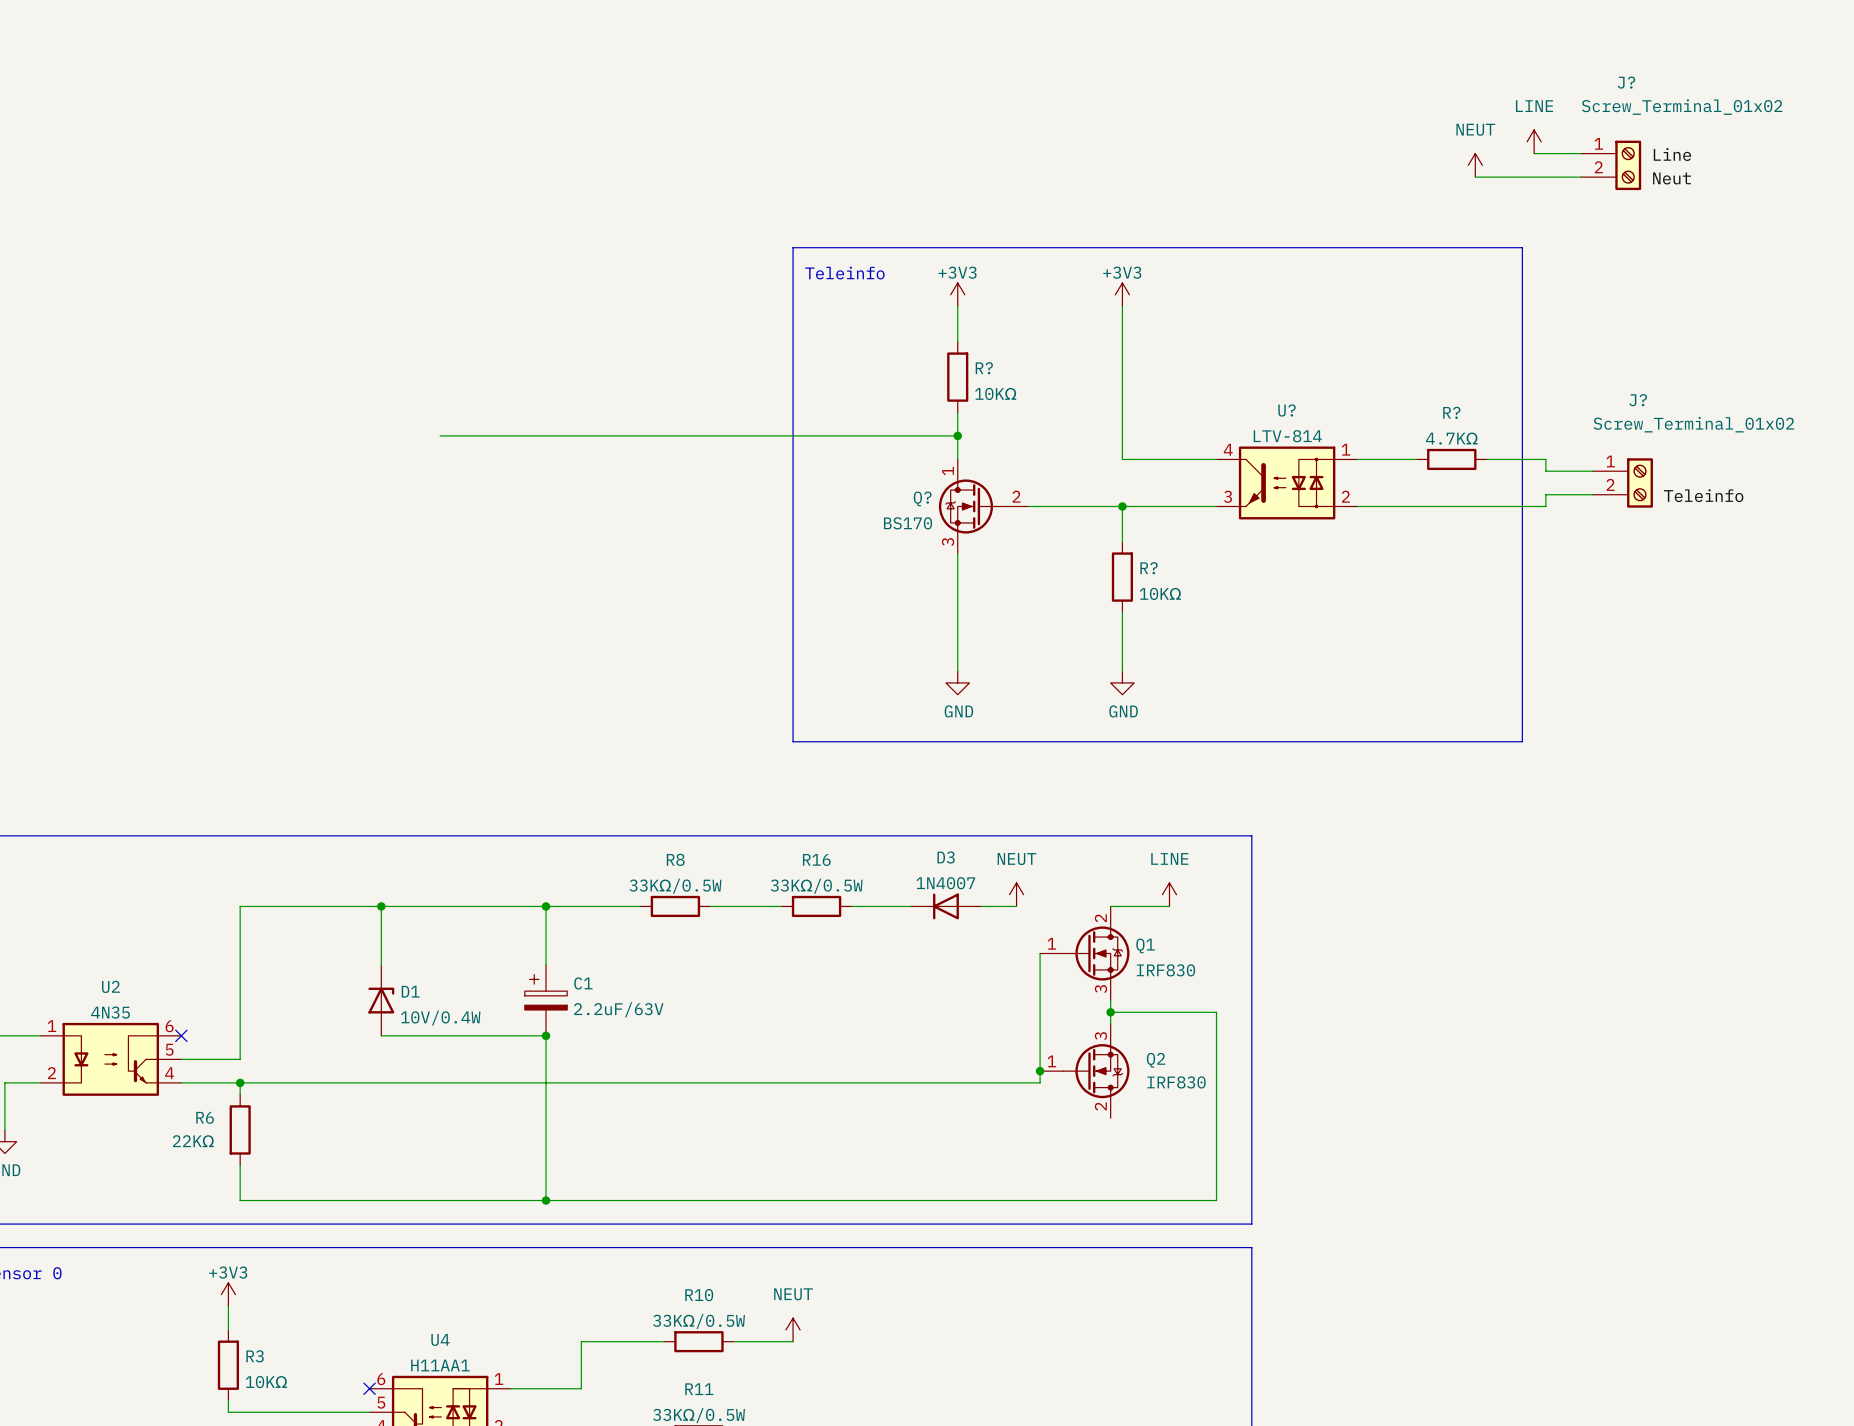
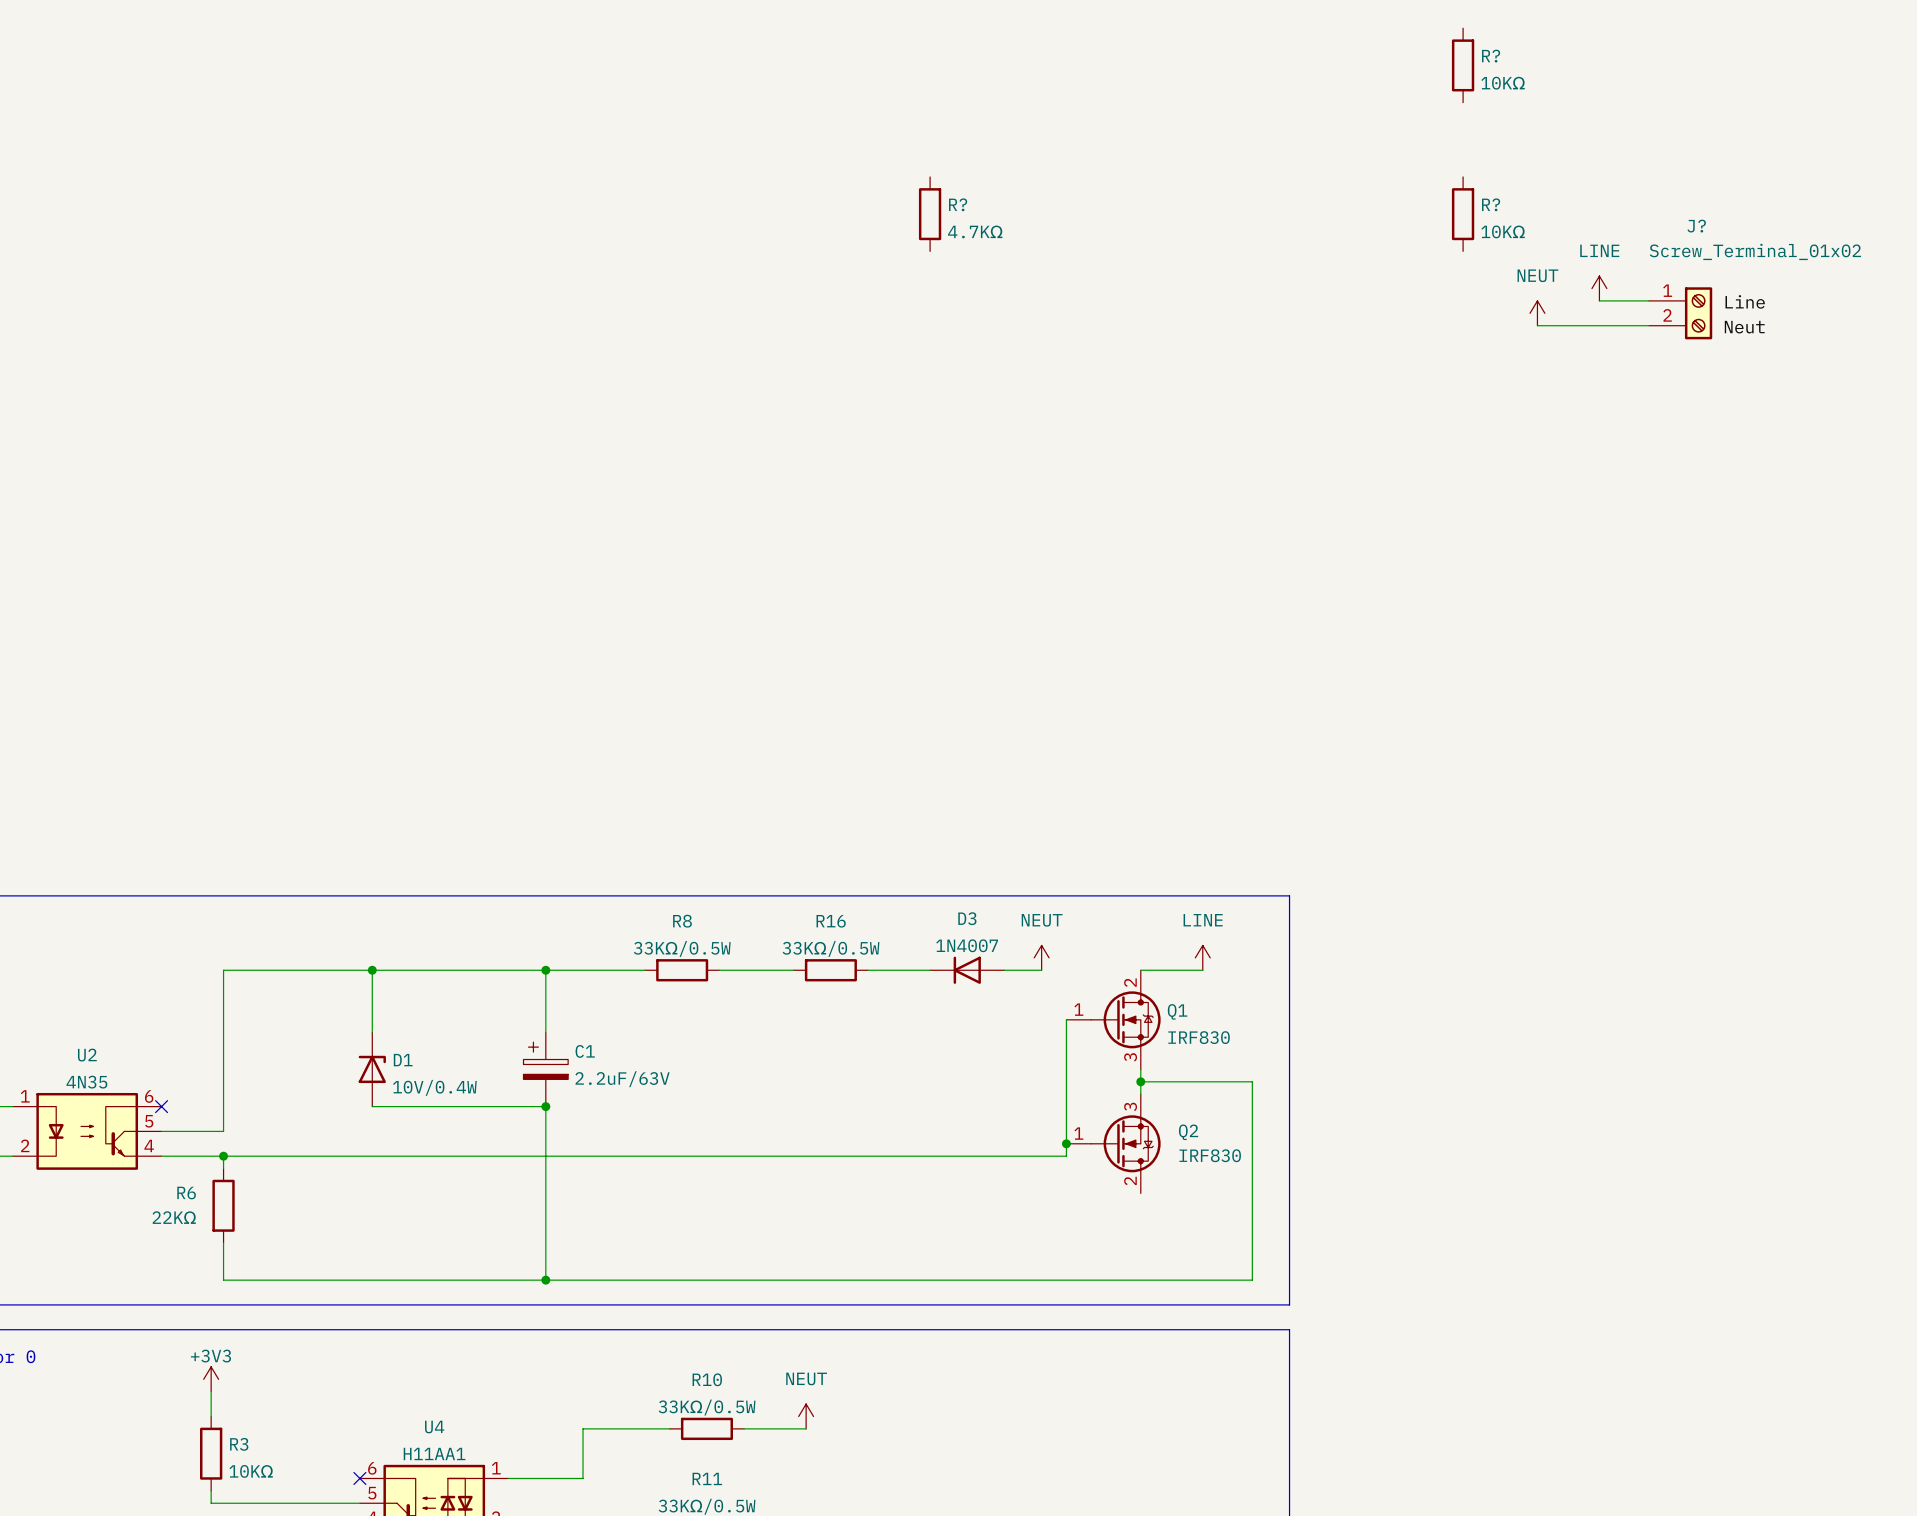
R?: none -> 10KΩ (1463, 65)
power symbol position: LINE (1534, 141) -> LINE (1599, 288)
wire: (1534, 153) (1581, 153) -> (1599, 300) (1649, 300)
label position: Line (1672, 154) -> Line (1745, 301)
power symbol position: NEUT (1475, 165) -> NEUT (1537, 313)
J?: Screw_Terminal_01x02 (1611, 165) -> none
wire: (1475, 177) (1581, 177) -> (1537, 325) (1649, 325)
label position: Neut (1672, 178) -> Neut (1744, 327)
R?: none -> 4.7KΩ (930, 214)
R?: none -> 10KΩ (1463, 214)
line: (793, 247) (1522, 247) (1522, 741) (793, 741) (793, 247) -> none
text: Teleinfo (844, 273) -> none
J?: none -> Screw_Terminal_01x02 (1680, 313)
power symbol: +3V3 (957, 294) -> none
power symbol: +3V3 (1122, 294) -> none
wire: (957, 306) (957, 341) -> none
wire: (1122, 306) (1122, 459) (1216, 459) -> none
R?: 10KΩ (957, 377) -> none
wire: (957, 412) (957, 459) -> none
wire: (440, 435) (957, 435) -> none
junction: (957, 435) -> none
wire: (1357, 459) (1416, 459) -> none
R?: 4.7KΩ (1451, 459) -> none
wire: (1487, 459) (1545, 459) (1545, 471) (1592, 471) -> none
U?: LTV-814 (1287, 482) -> none
J?: Screw_Terminal_01x02 (1622, 482) -> none
wire: (1592, 494) (1545, 494) (1545, 506) (1357, 506) -> none
label: Teleinfo (1703, 495) -> none
Q?: BS170 (983, 506) -> none
wire: (1028, 506) (1216, 506) -> none
wire: (1122, 506) (1122, 541) -> none
junction: (1122, 506) -> none
wire: (957, 553) (957, 671) -> none
R?: 10KΩ (1122, 577) -> none
wire: (1122, 612) (1122, 671) -> none
power symbol: GND (957, 682) -> none
power symbol: GND (1122, 682) -> none

